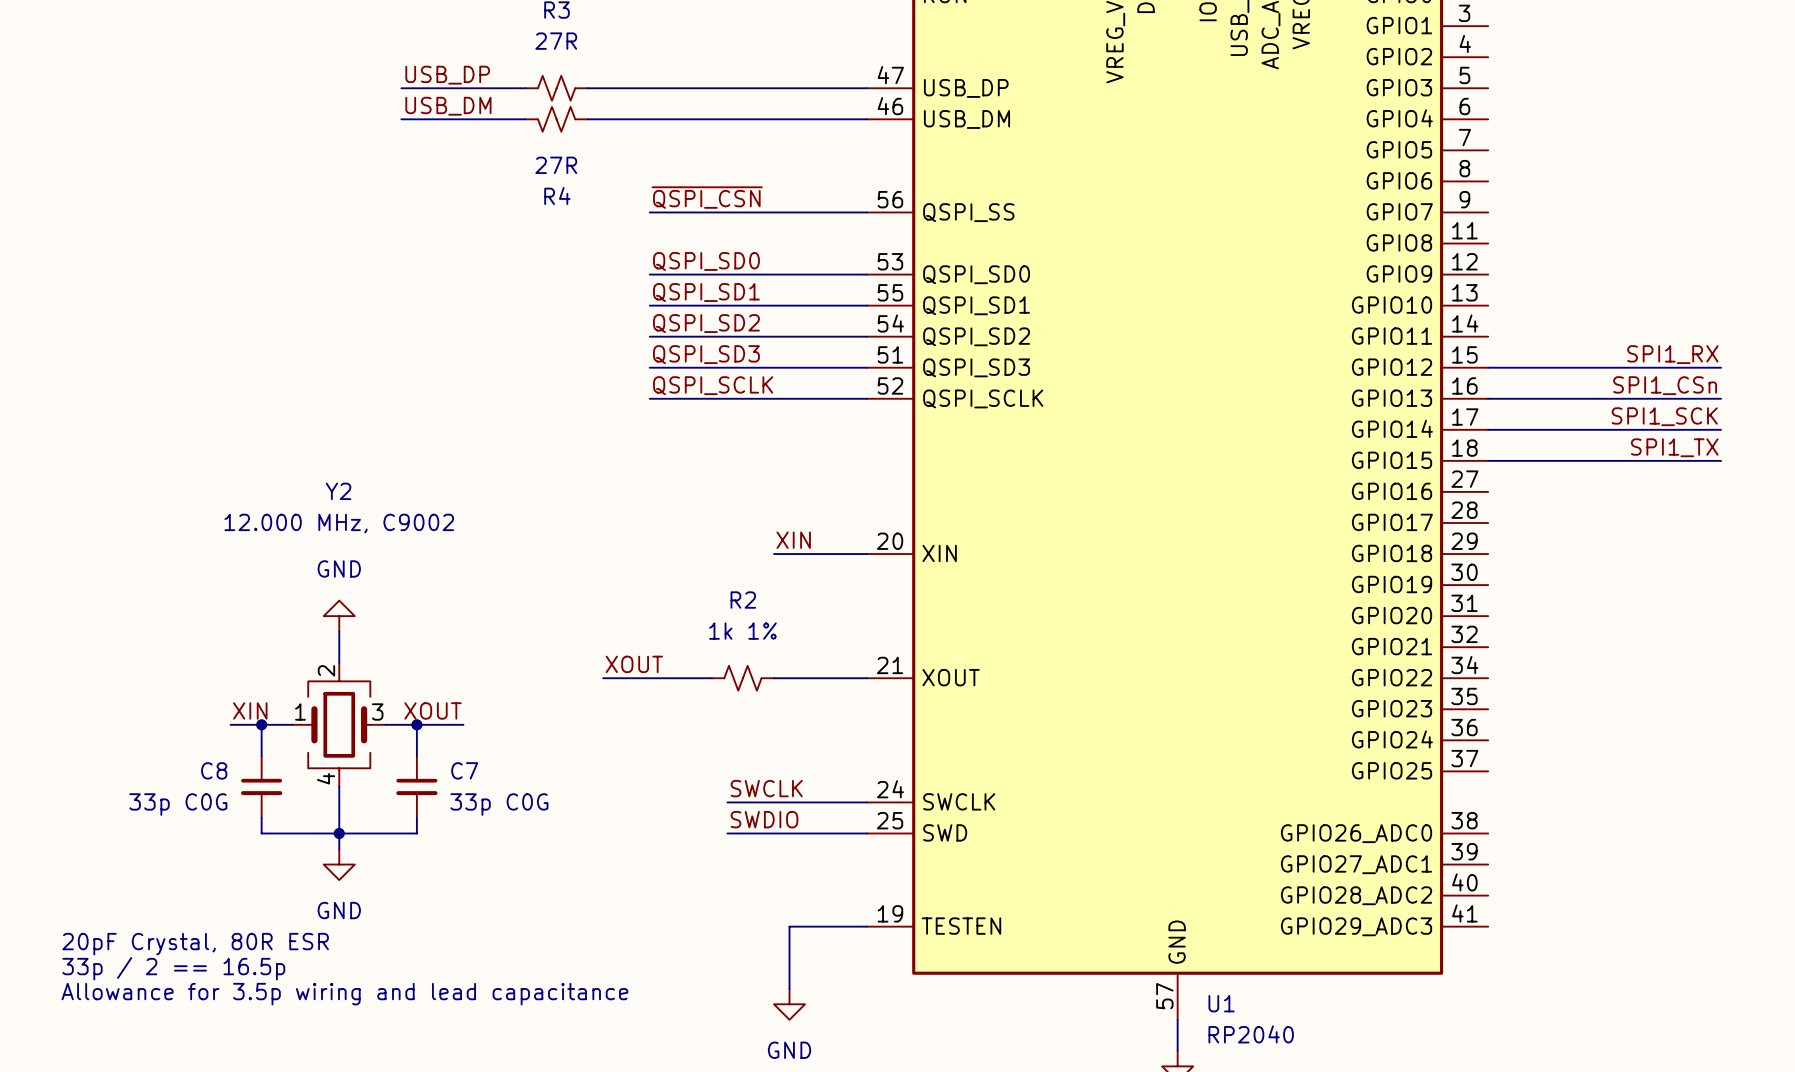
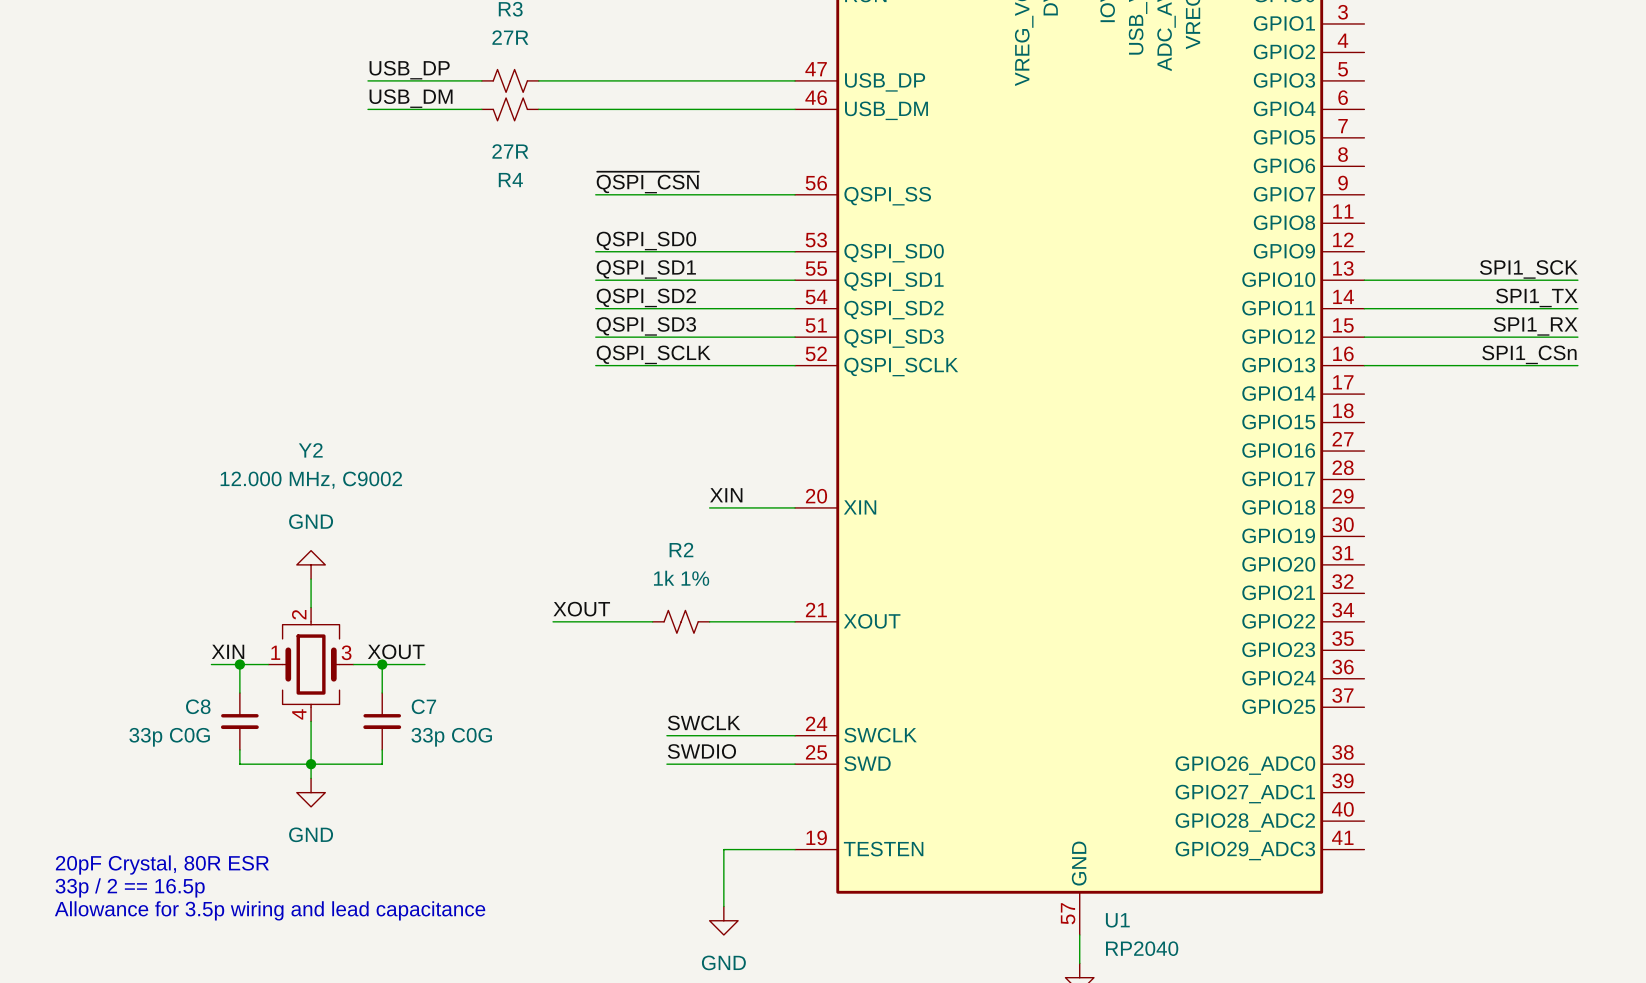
label position: SPI1_SCK (1664, 416) -> SPI1_SCK (1528, 269)
wire: (1488, 429) (1721, 429) -> (1364, 308) (1577, 308)
label position: SPI1_TX (1674, 447) -> SPI1_TX (1536, 297)
wire: (1488, 460) (1721, 460) -> (1364, 280) (1577, 280)

